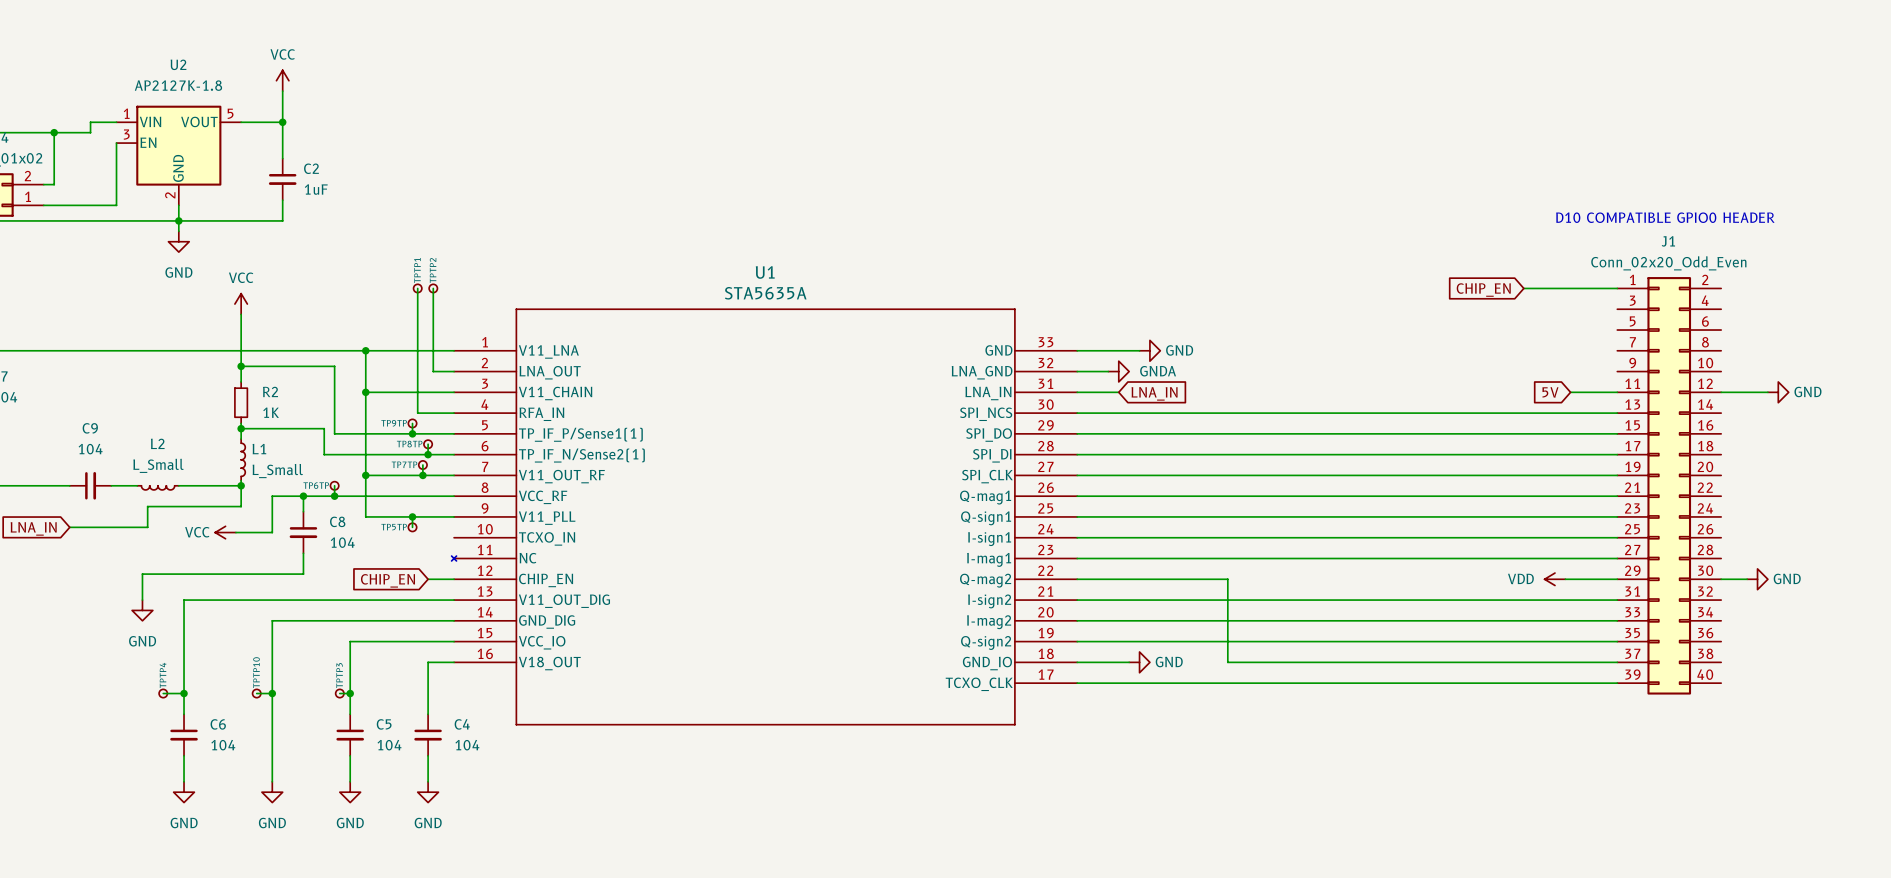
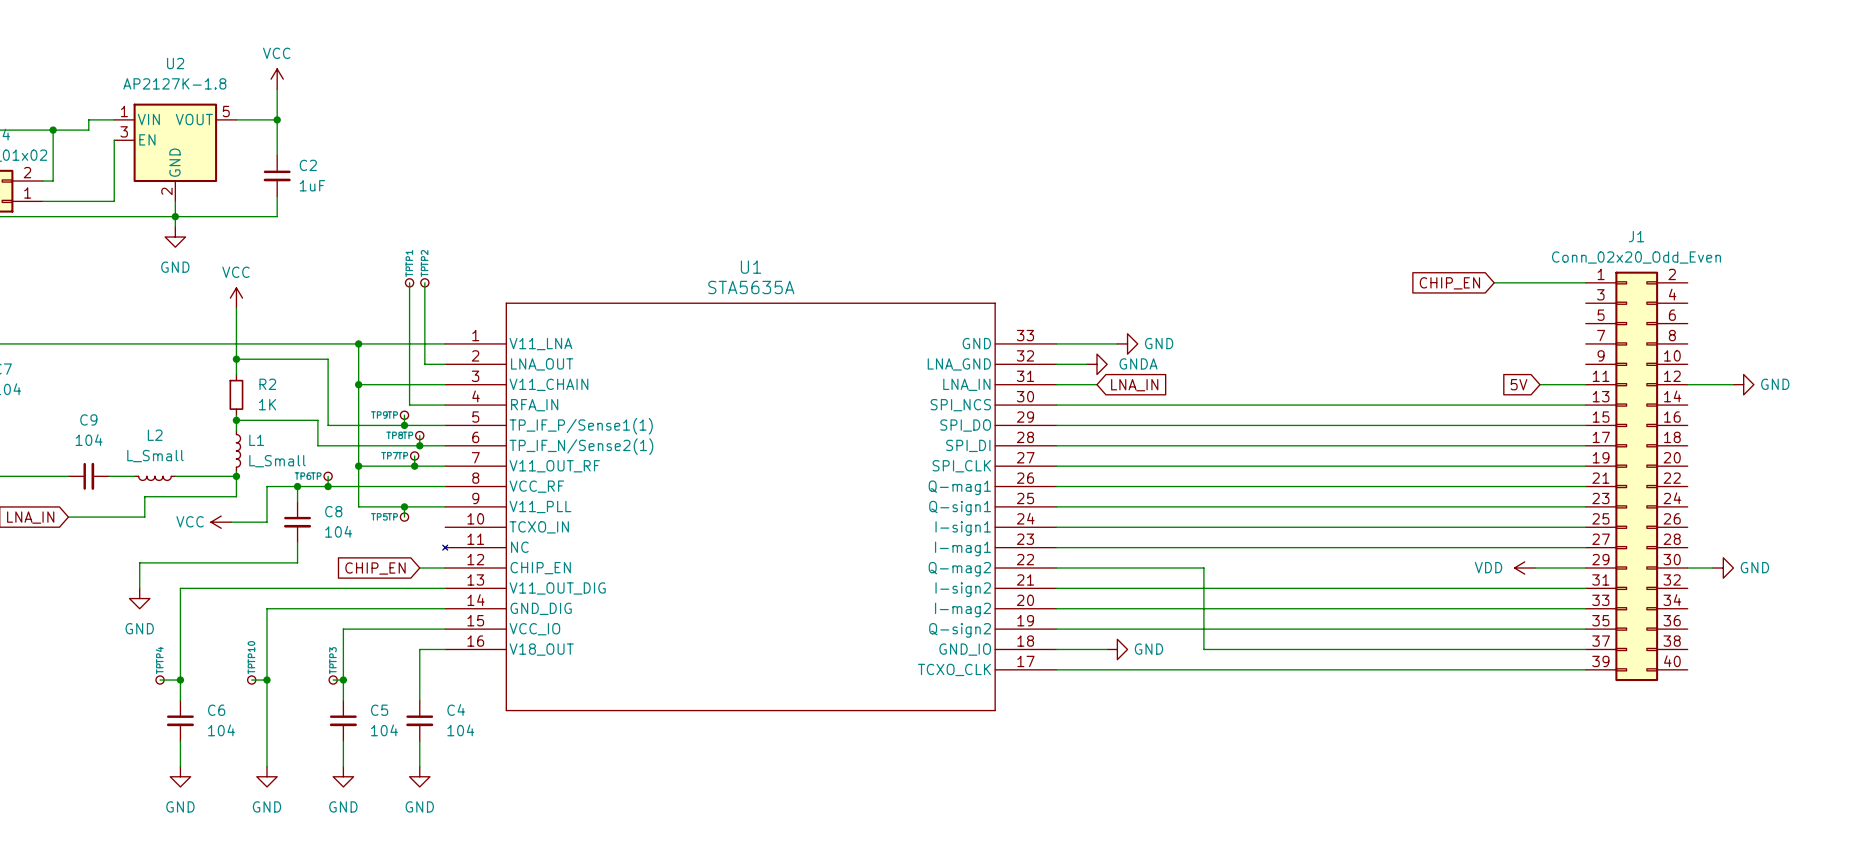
text: D10 COMPATIBLE GPIO0 HEADER (1665, 217) -> none

